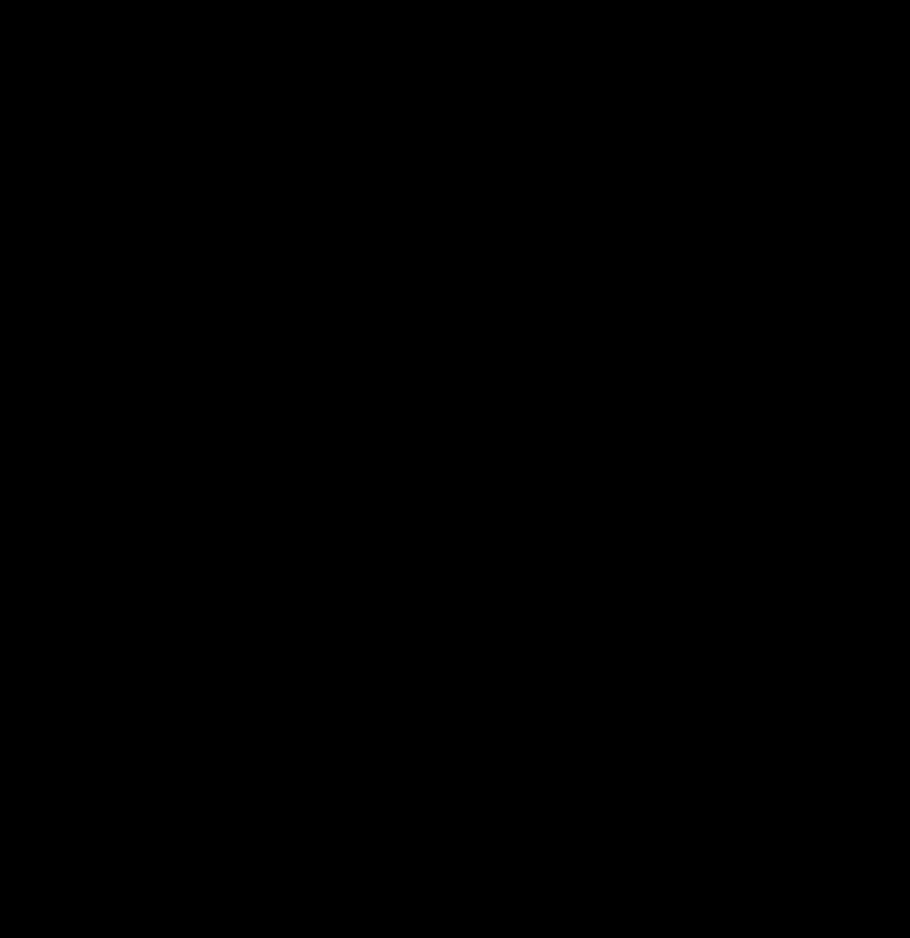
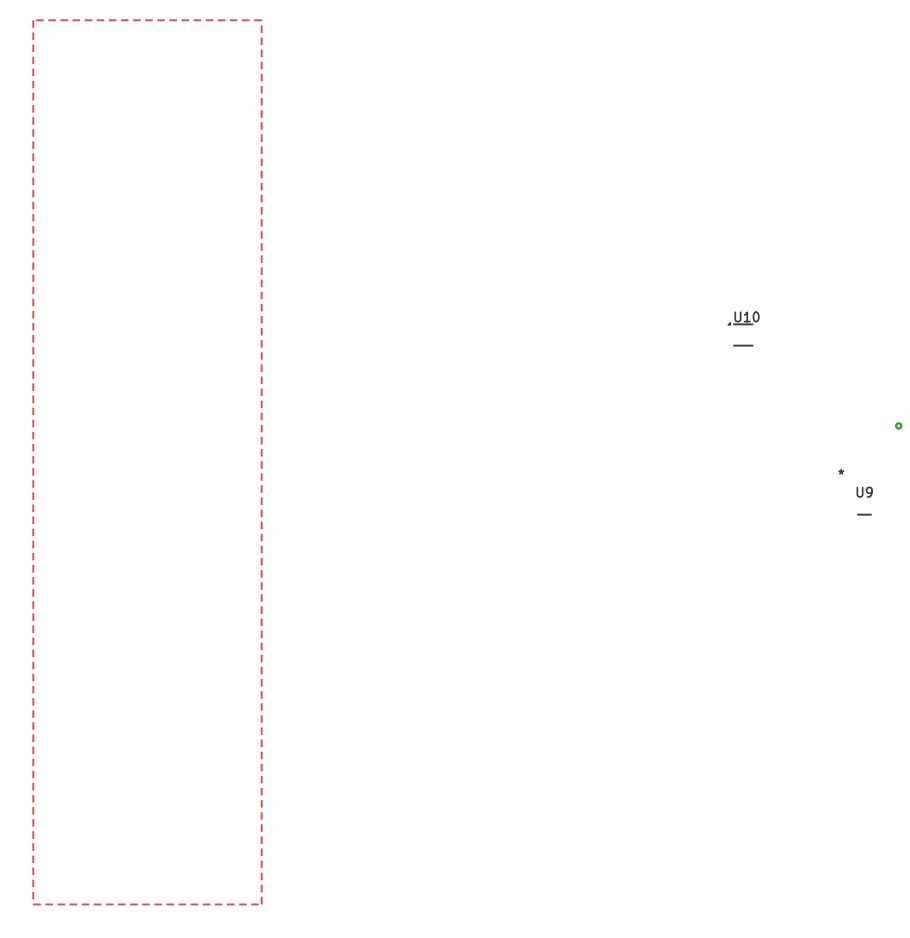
zone outline: none -> (33, 20) (261, 20) (261, 904) (33, 904) (33, 20)
U10: none -> (740, 334)
via: none -> (898, 425)
U9: none -> (864, 514)

